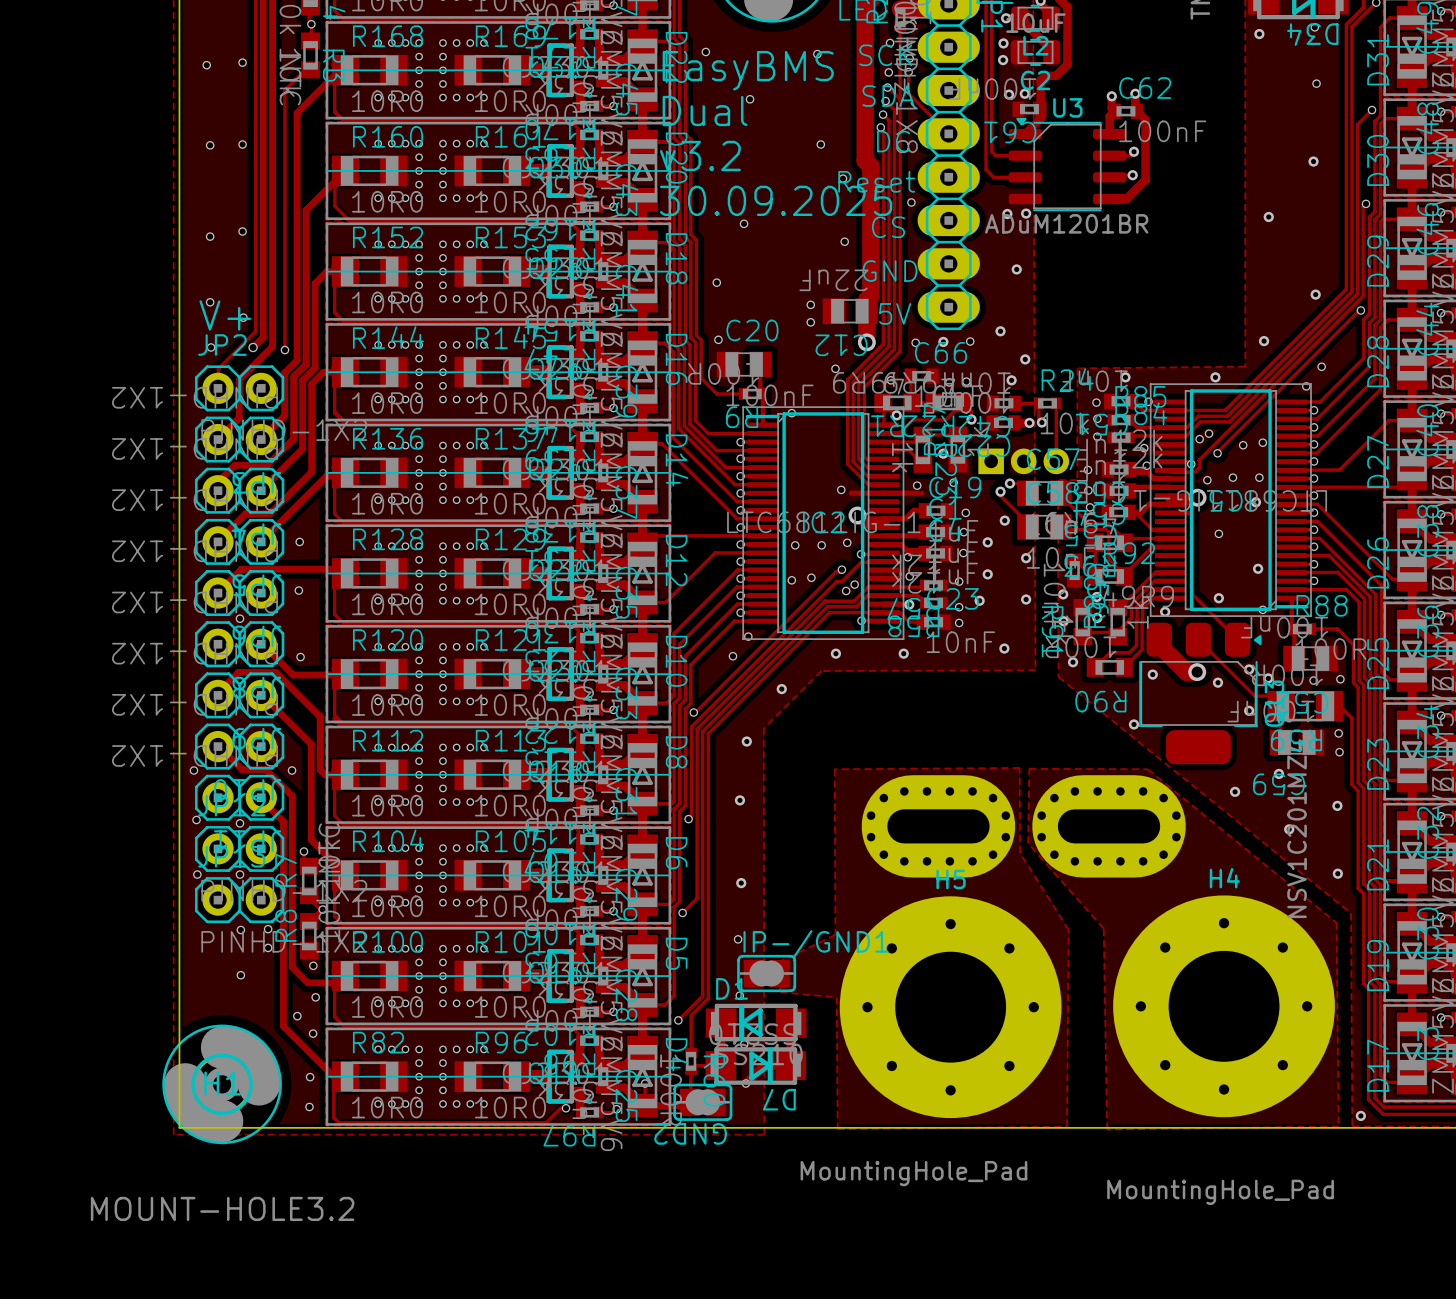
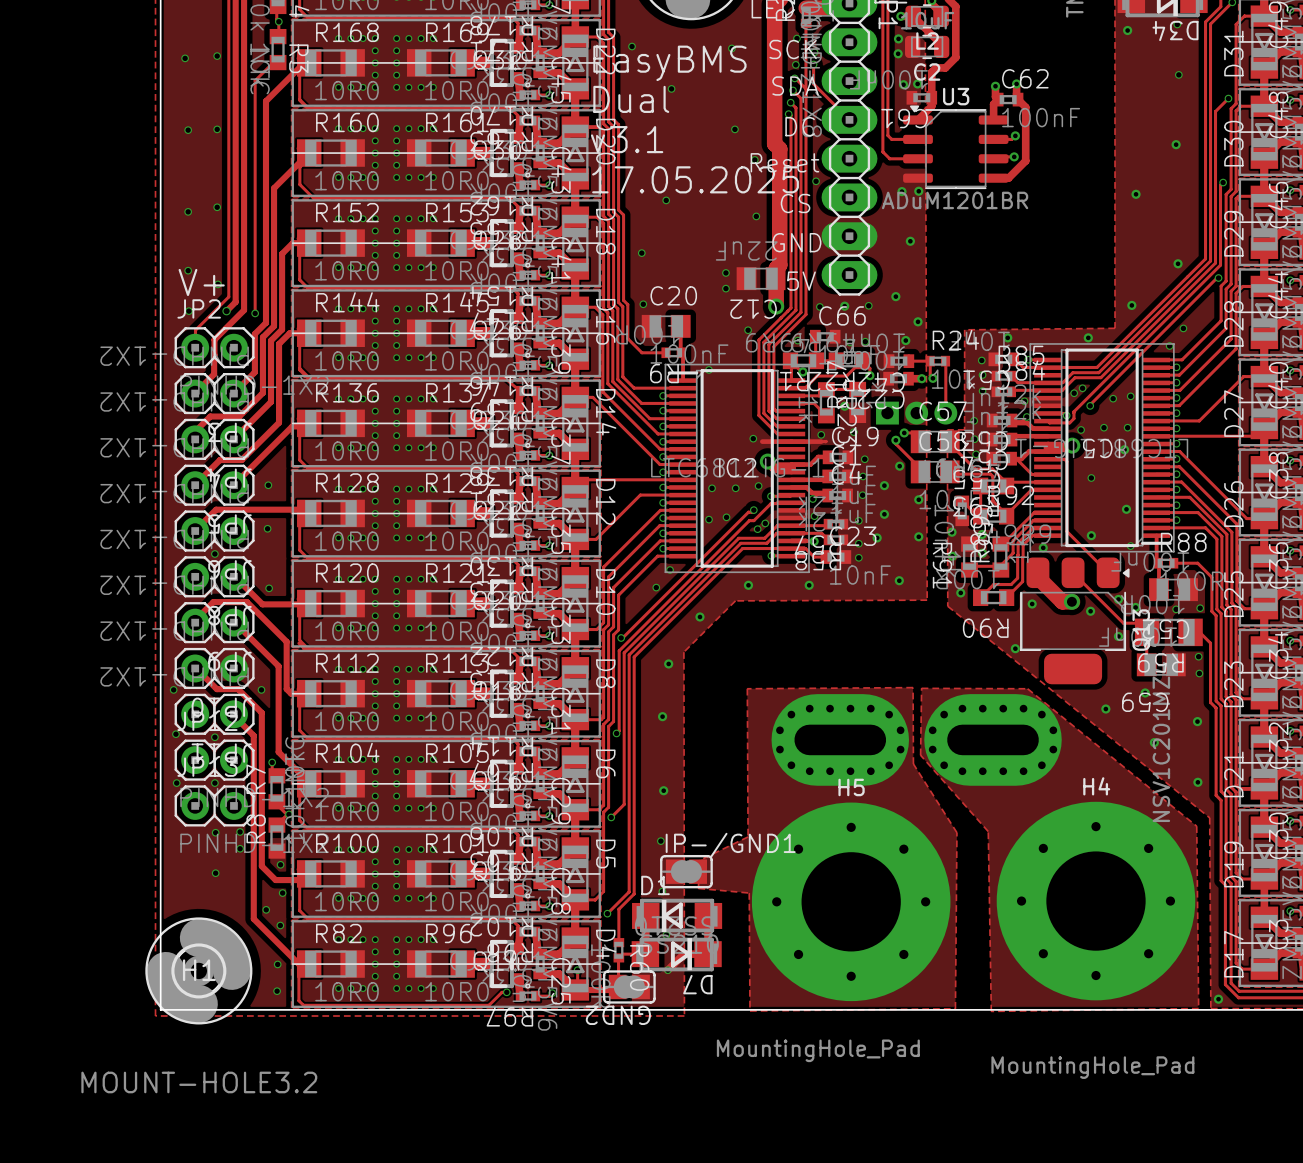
text: v3.2 (700, 155) -> v3.1 (627, 139)
text: 30.09.2025 (776, 200) -> 17.05.2025 (695, 179)

